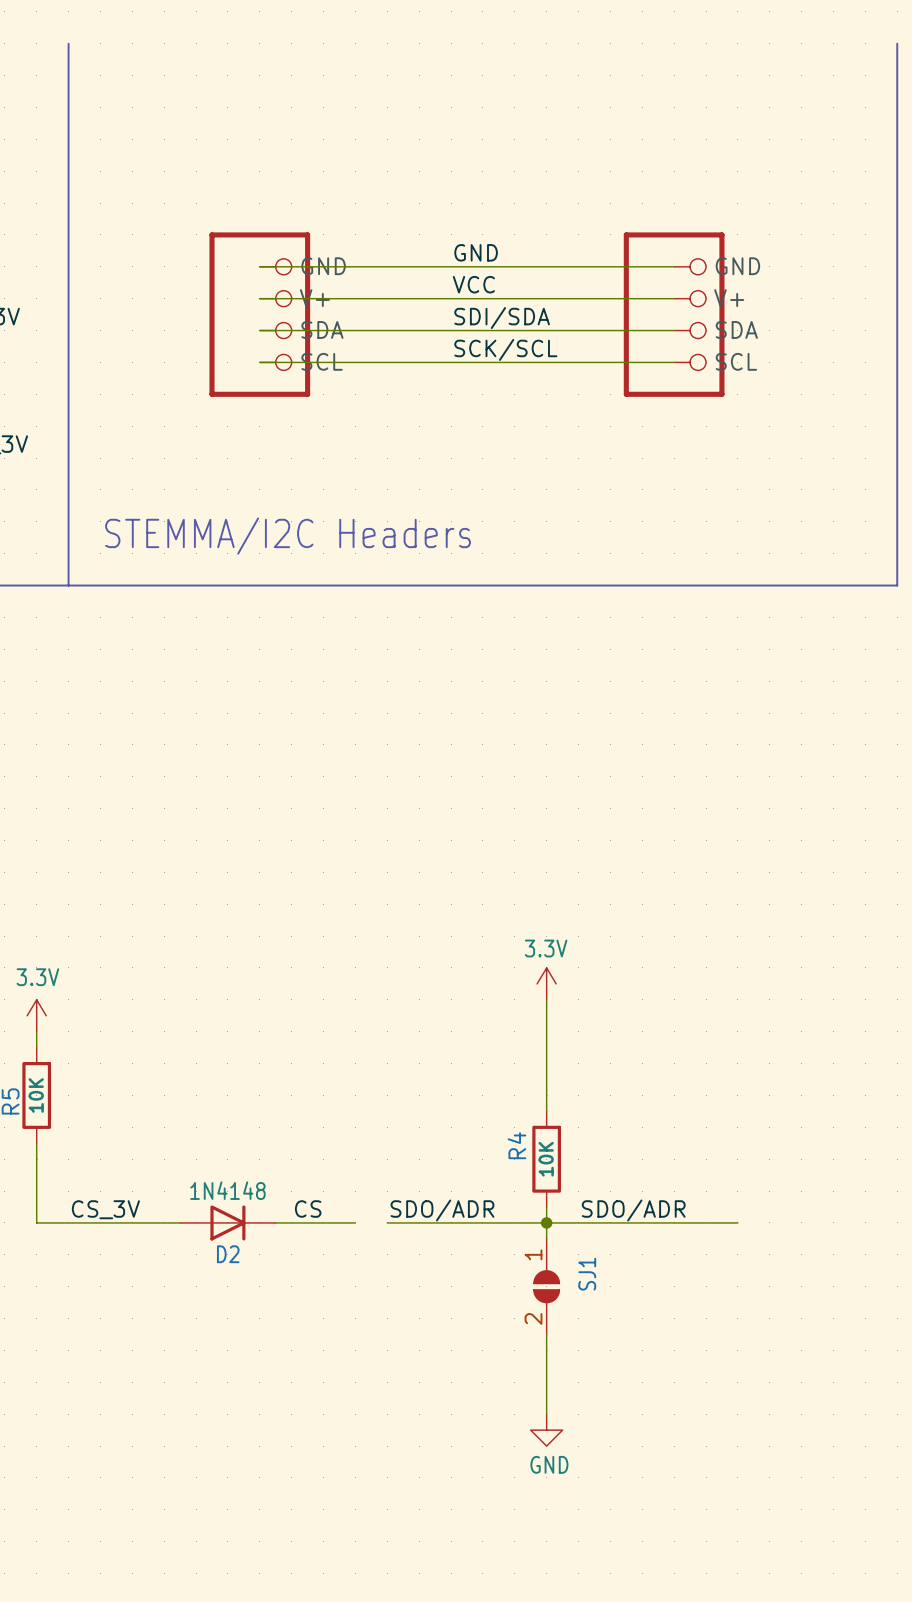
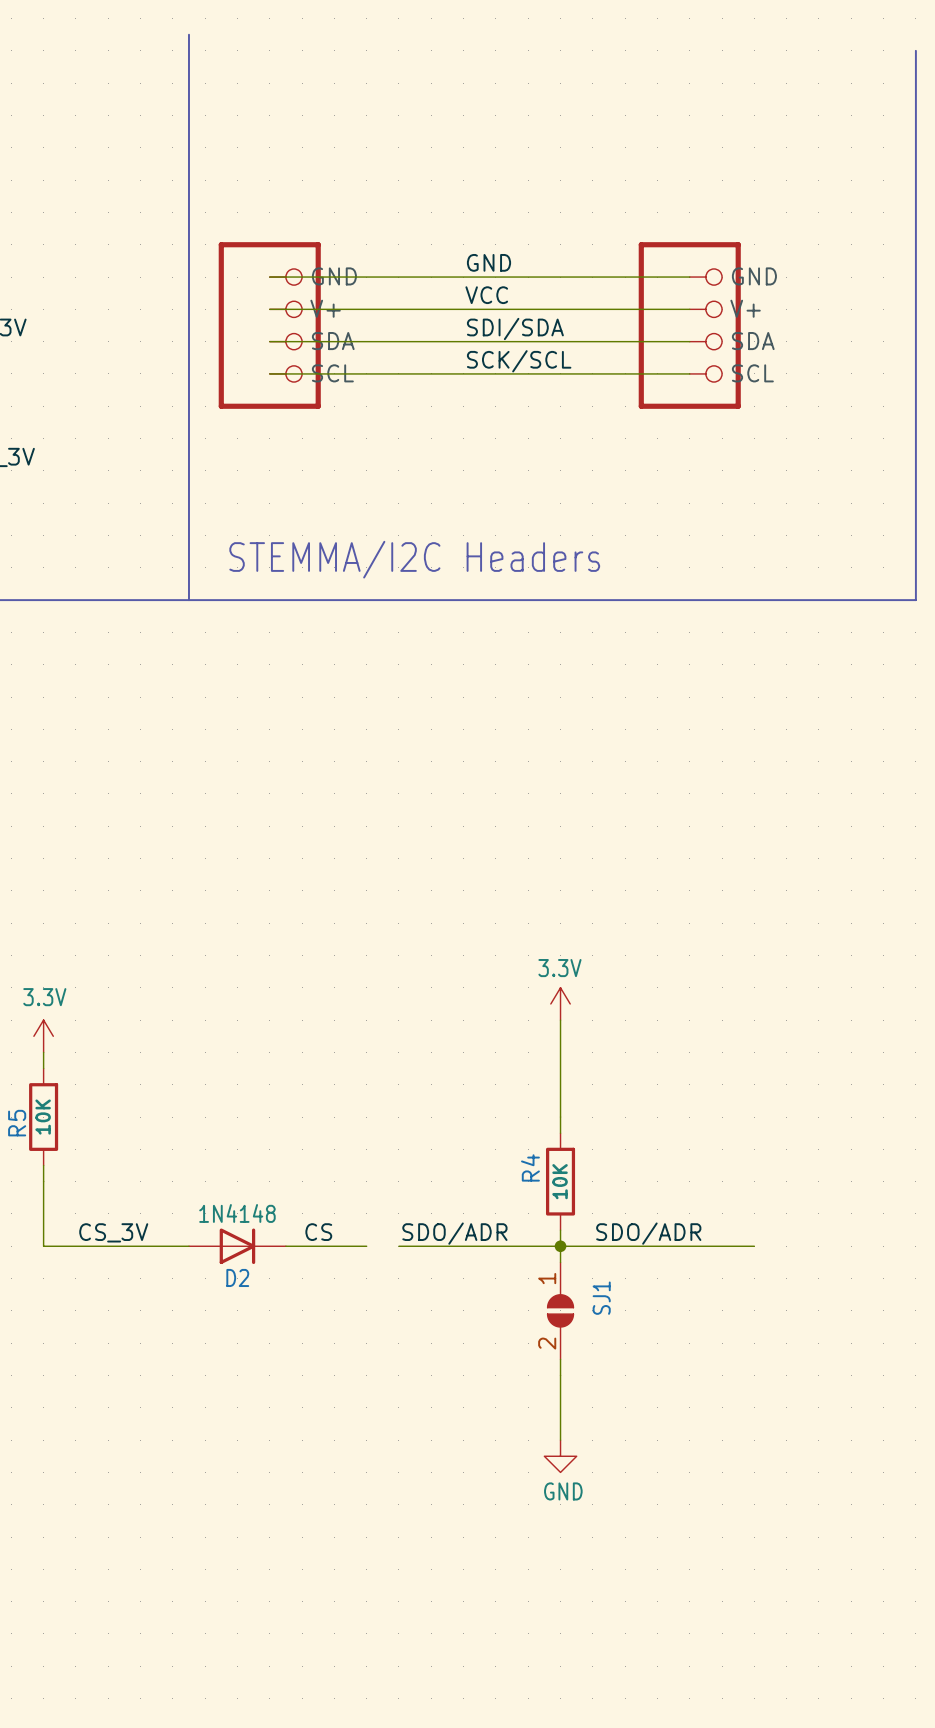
line: none -> (188, 34) (188, 600)
line: (68, 43) (68, 585) -> none
text position: STEMMA/I2C Headers (288, 536) -> STEMMA/I2C Headers (414, 559)

